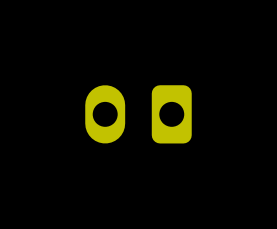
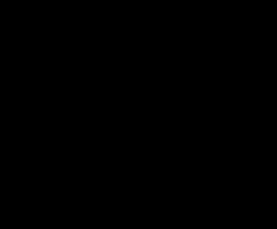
part: (138, 114) -> none

